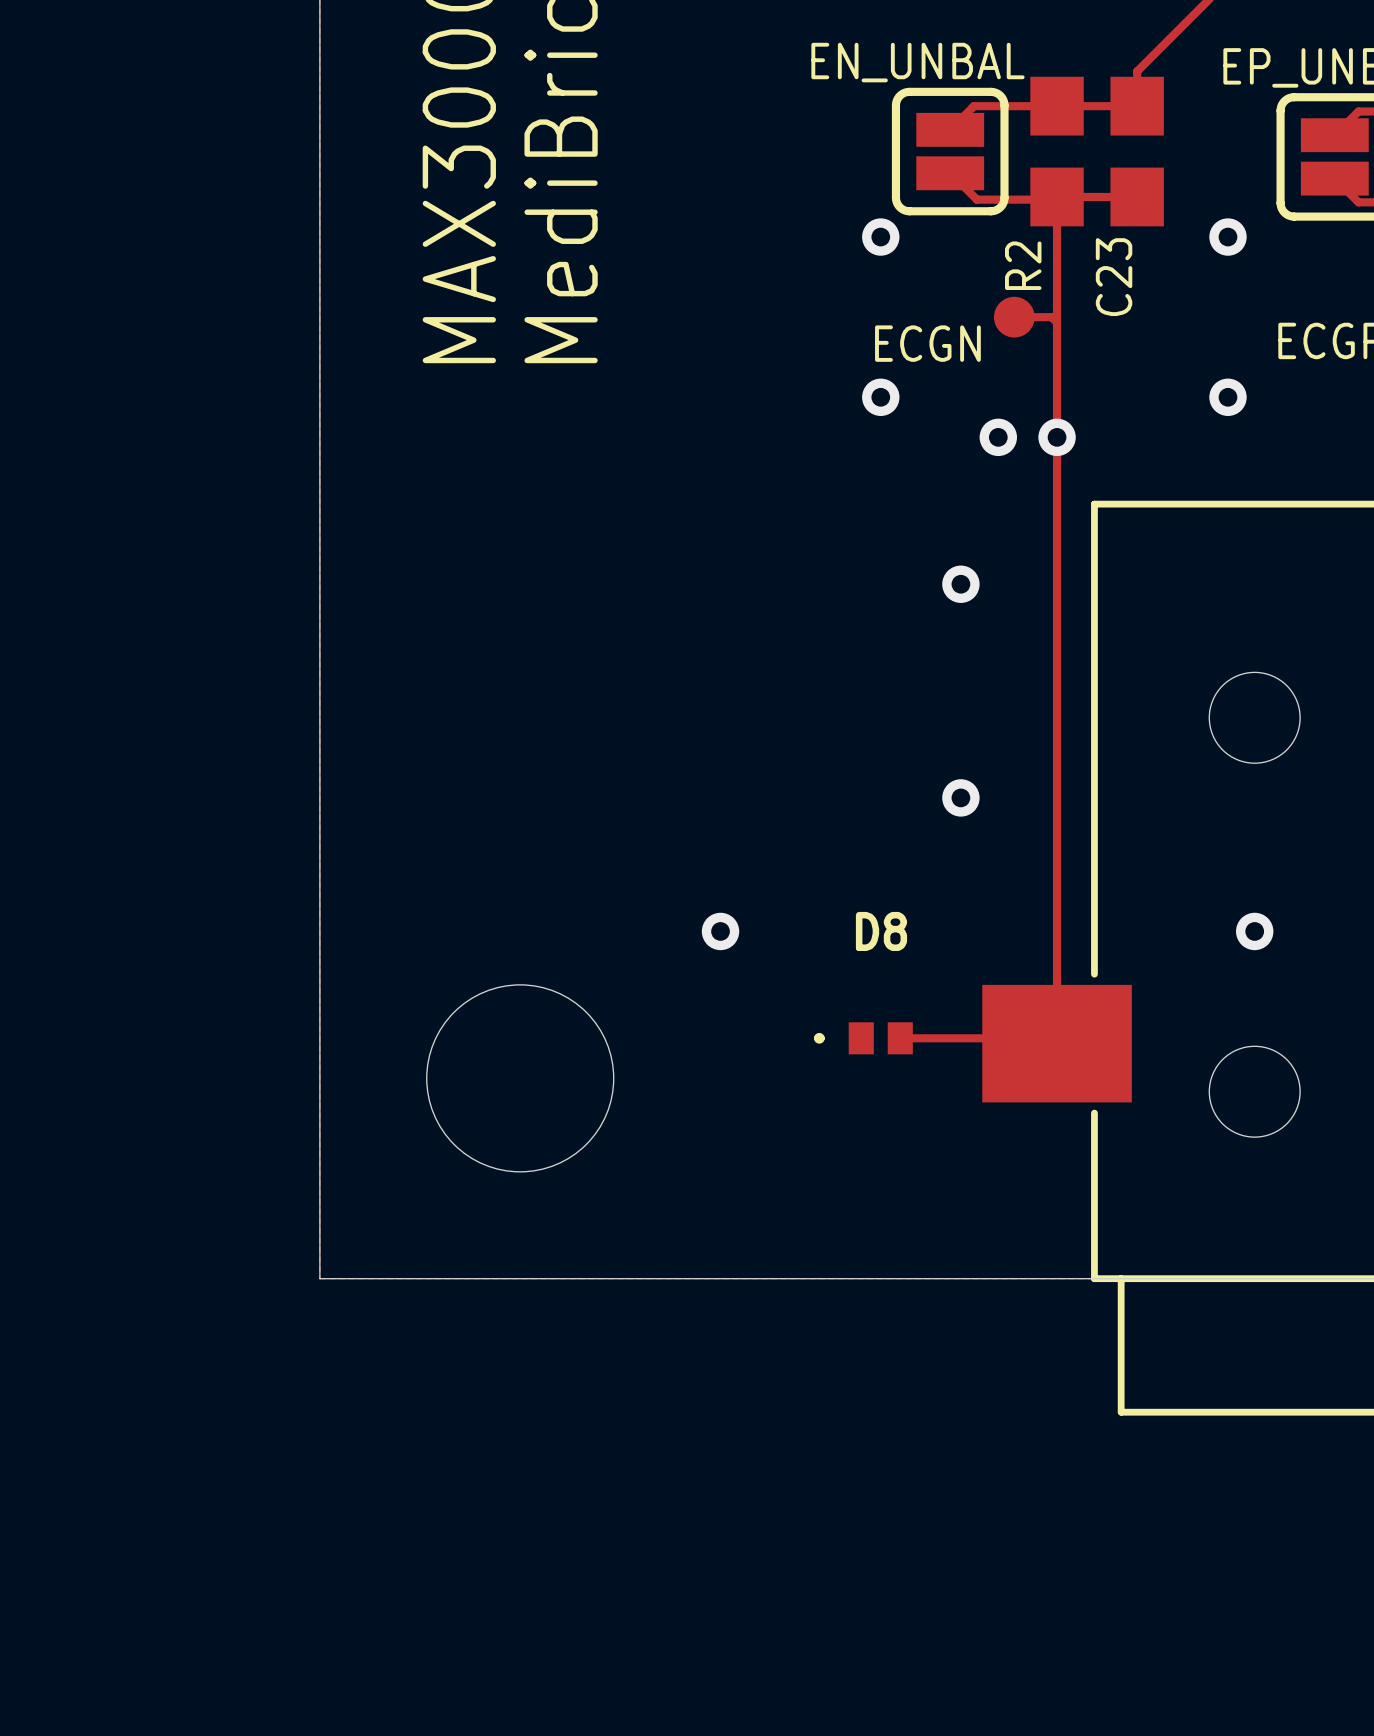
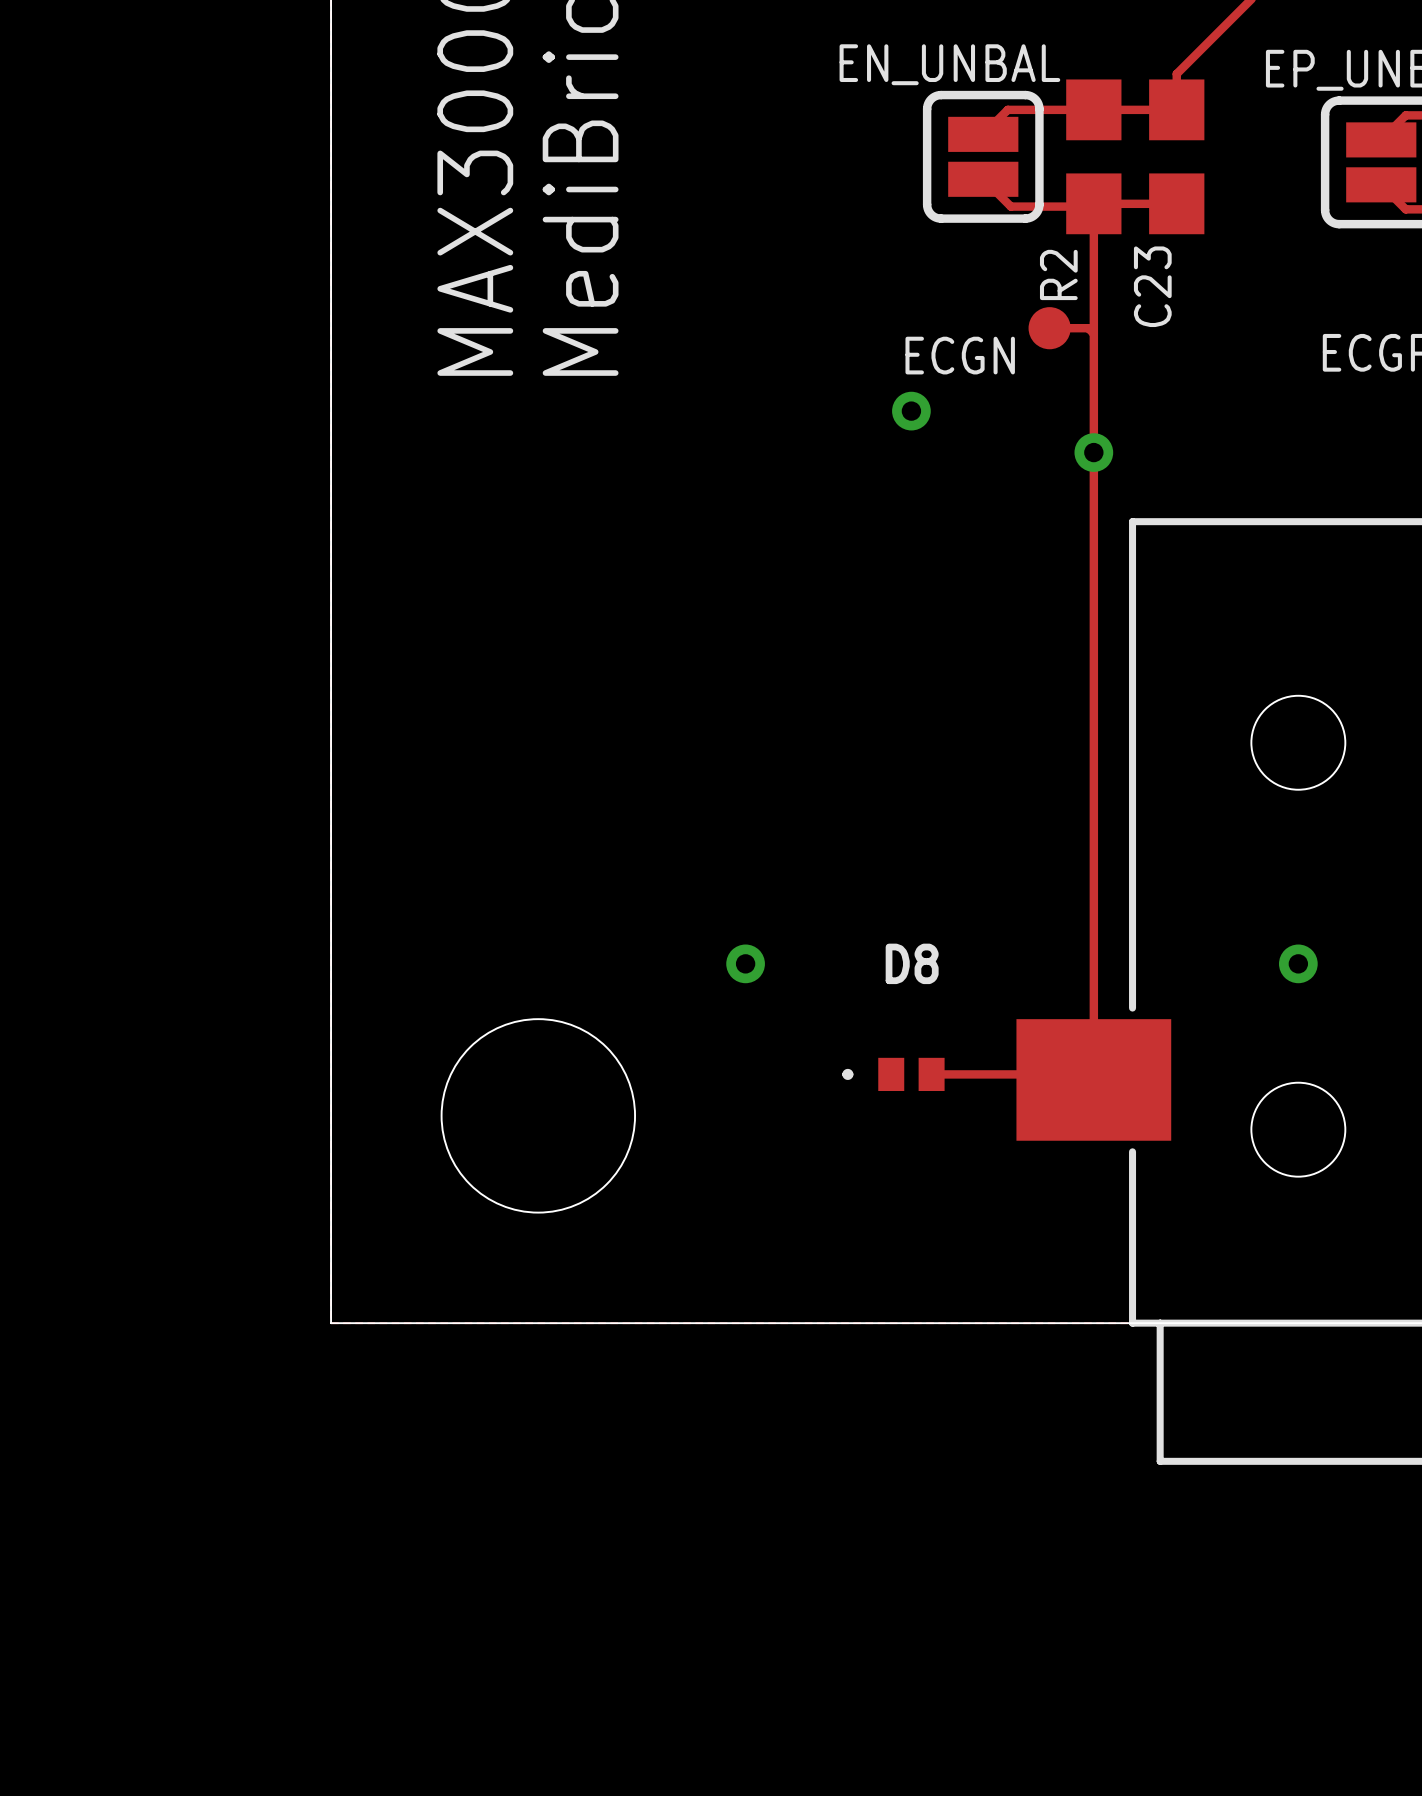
via: (880, 237) -> none
via: (1227, 237) -> none
via: (1227, 397) -> none
via: (998, 437) -> none
via: (960, 584) -> none
via: (960, 797) -> none

